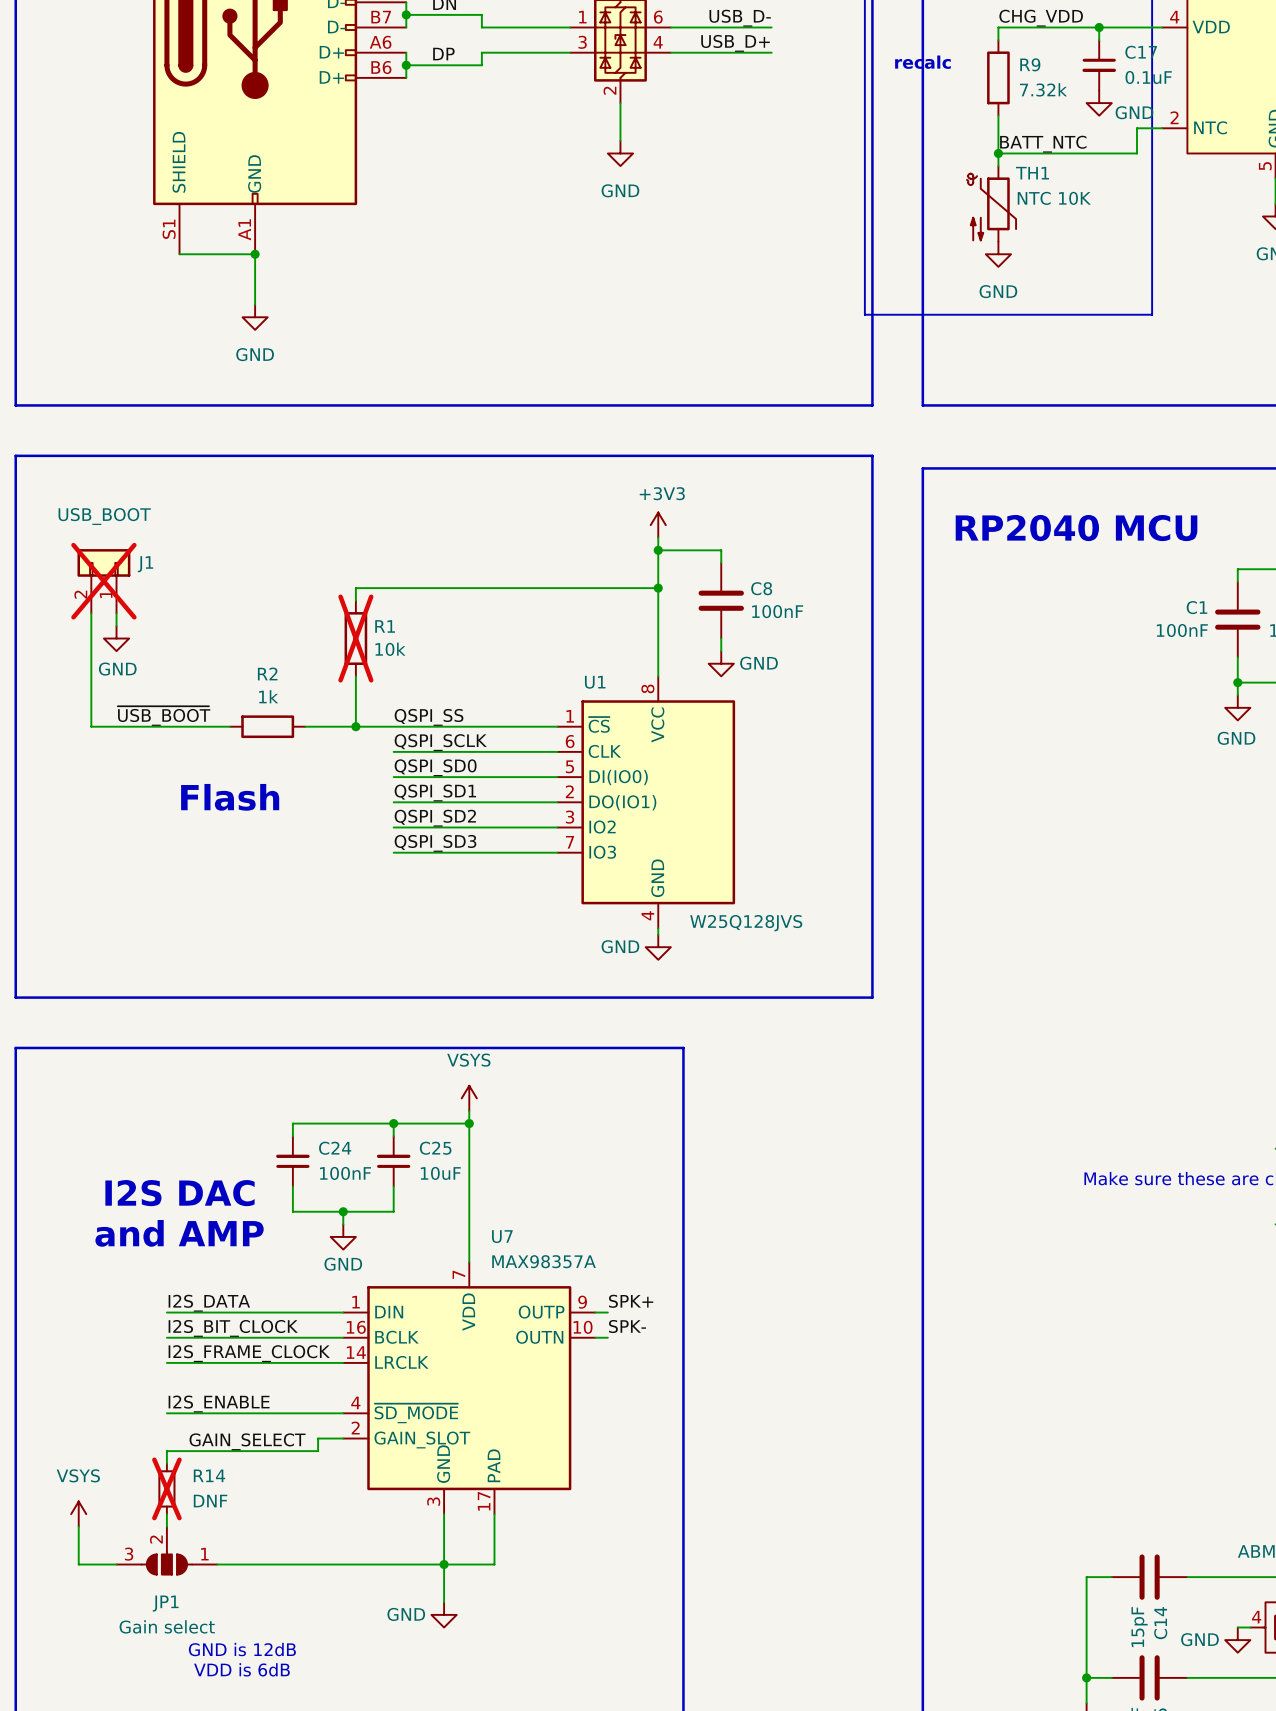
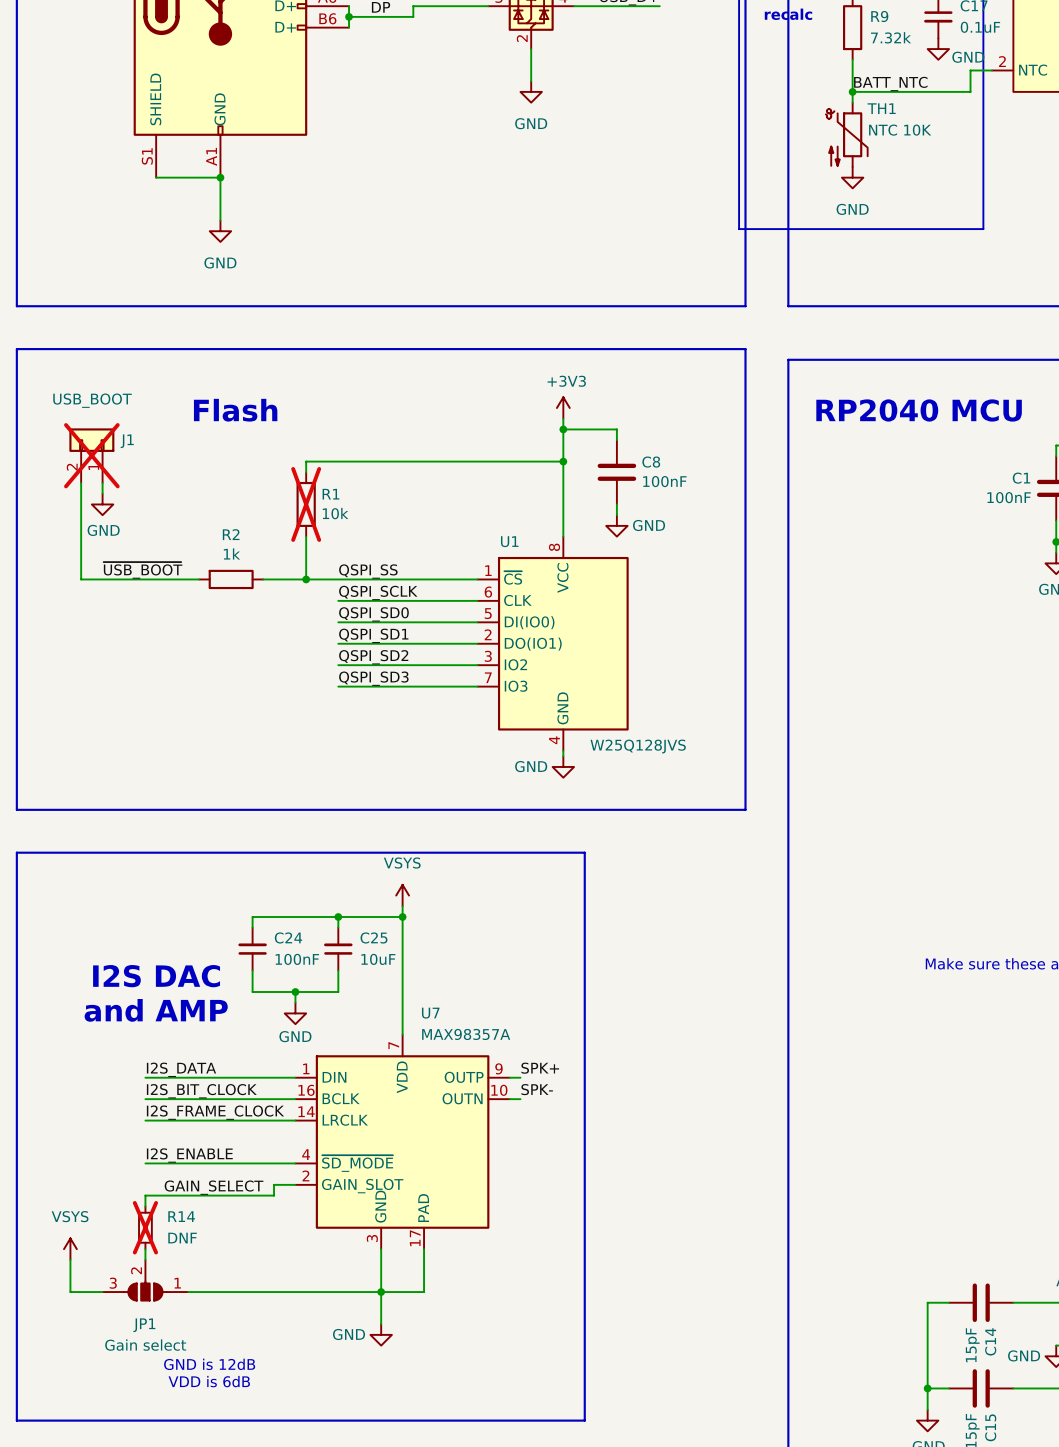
text: none -> Flash (235, 410)
text: Flash (230, 797) -> none

